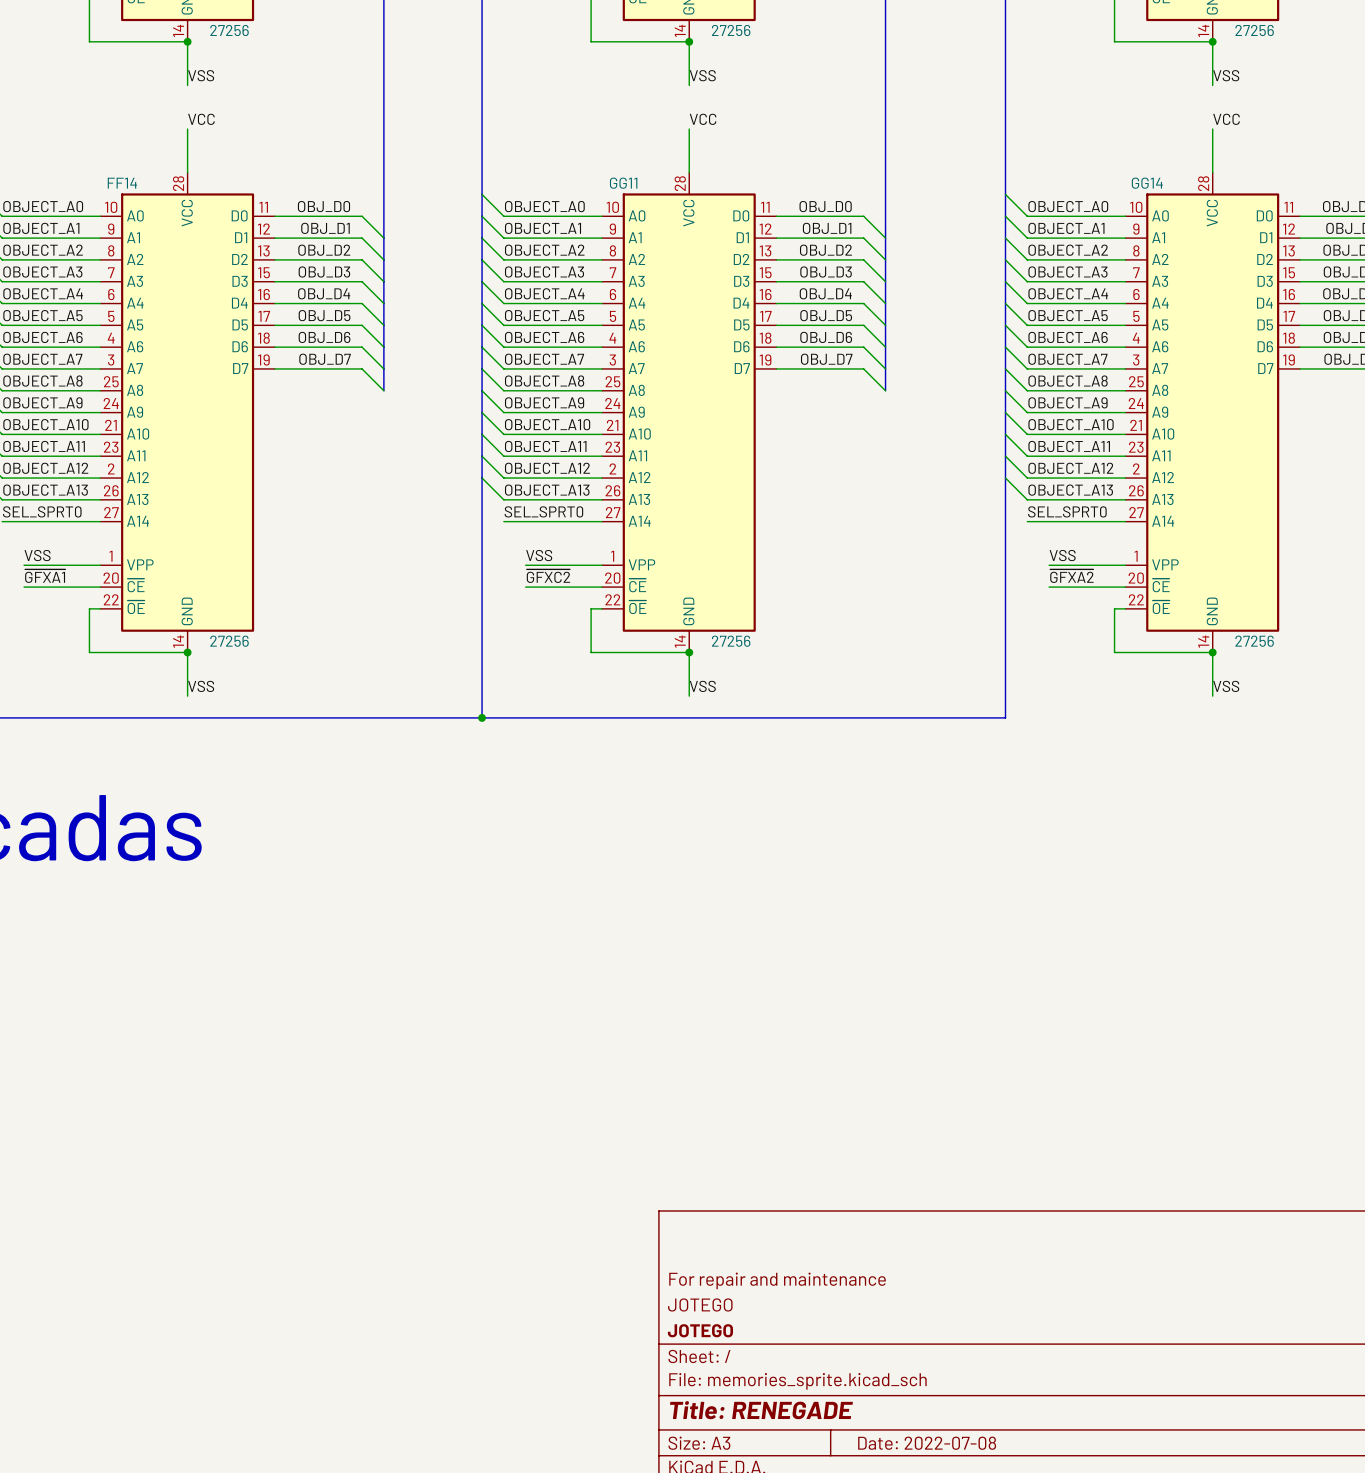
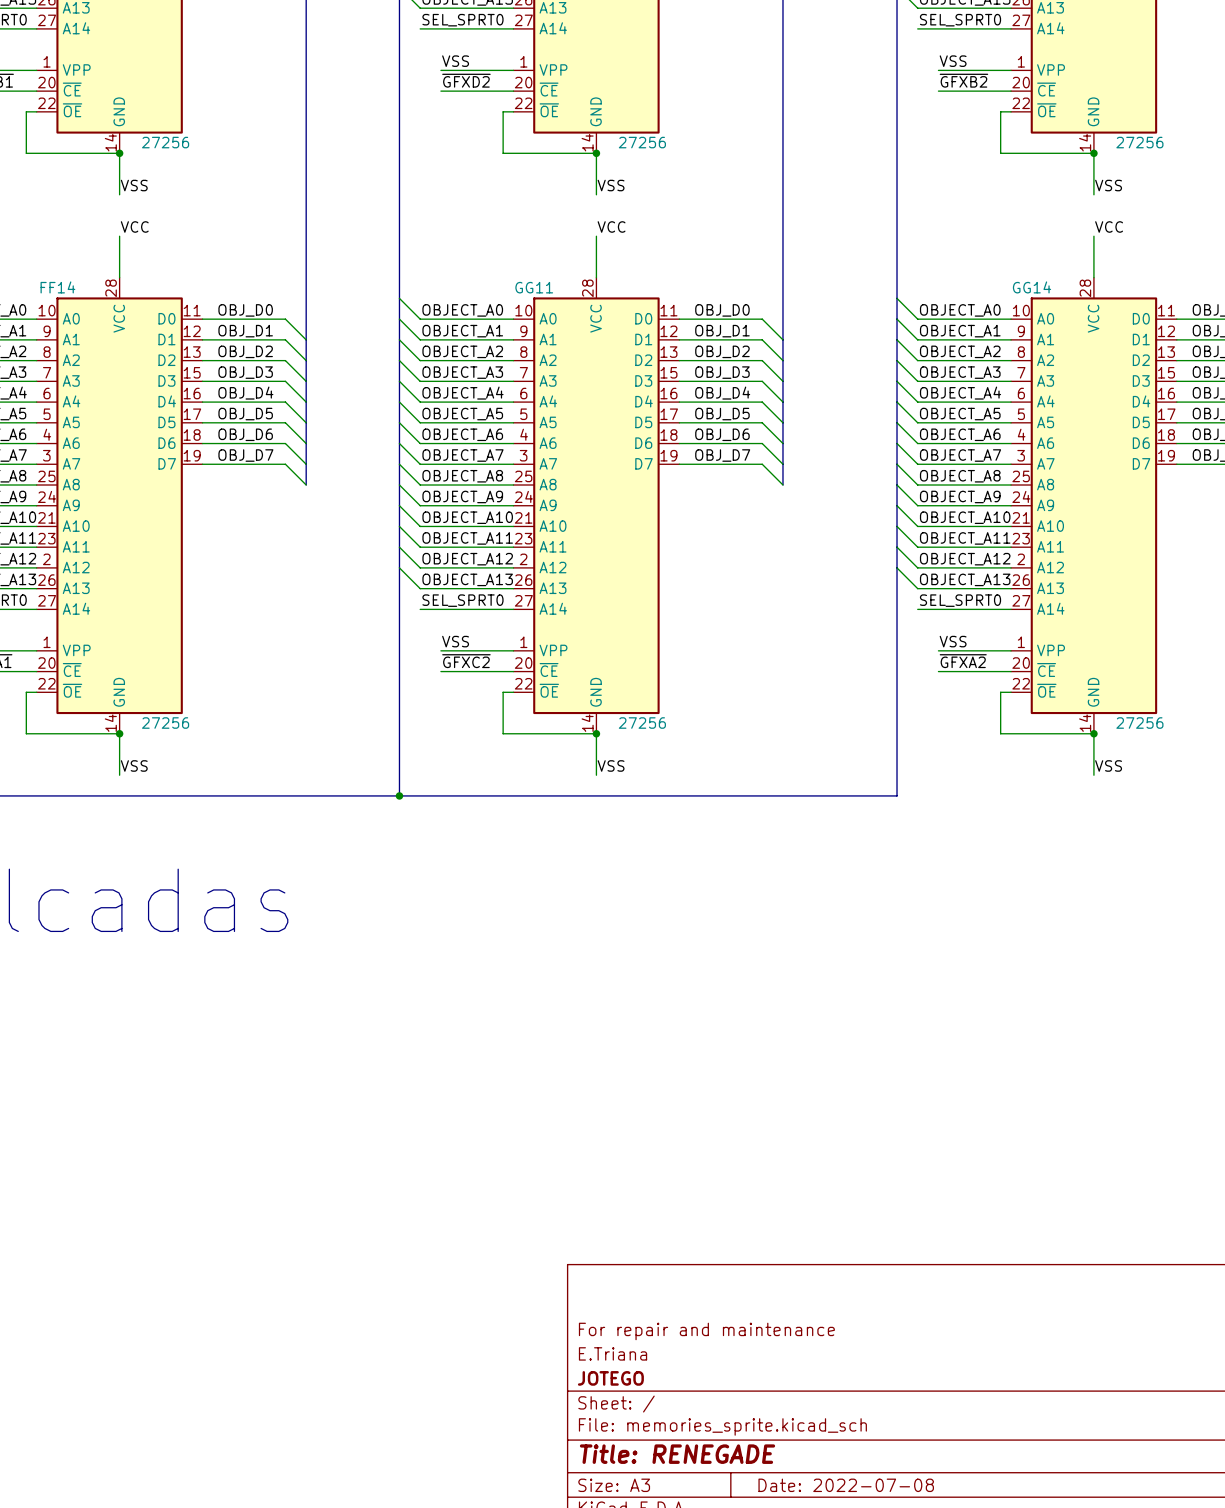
title block: JOTEGO (700, 1304) -> E.Triana (613, 1353)

